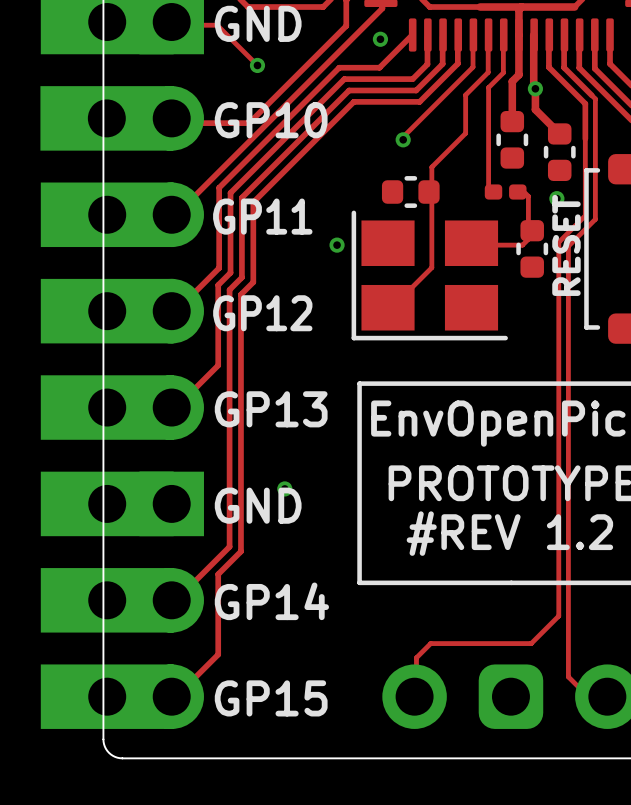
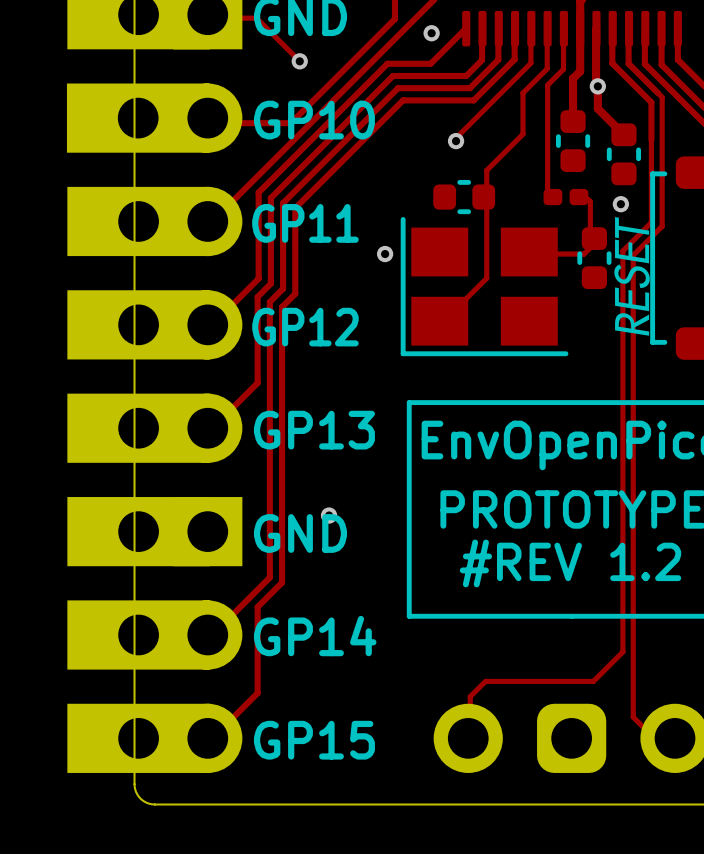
drawing: none -> [614, 217, 650, 336]
text: RESET (566, 245) -> none

